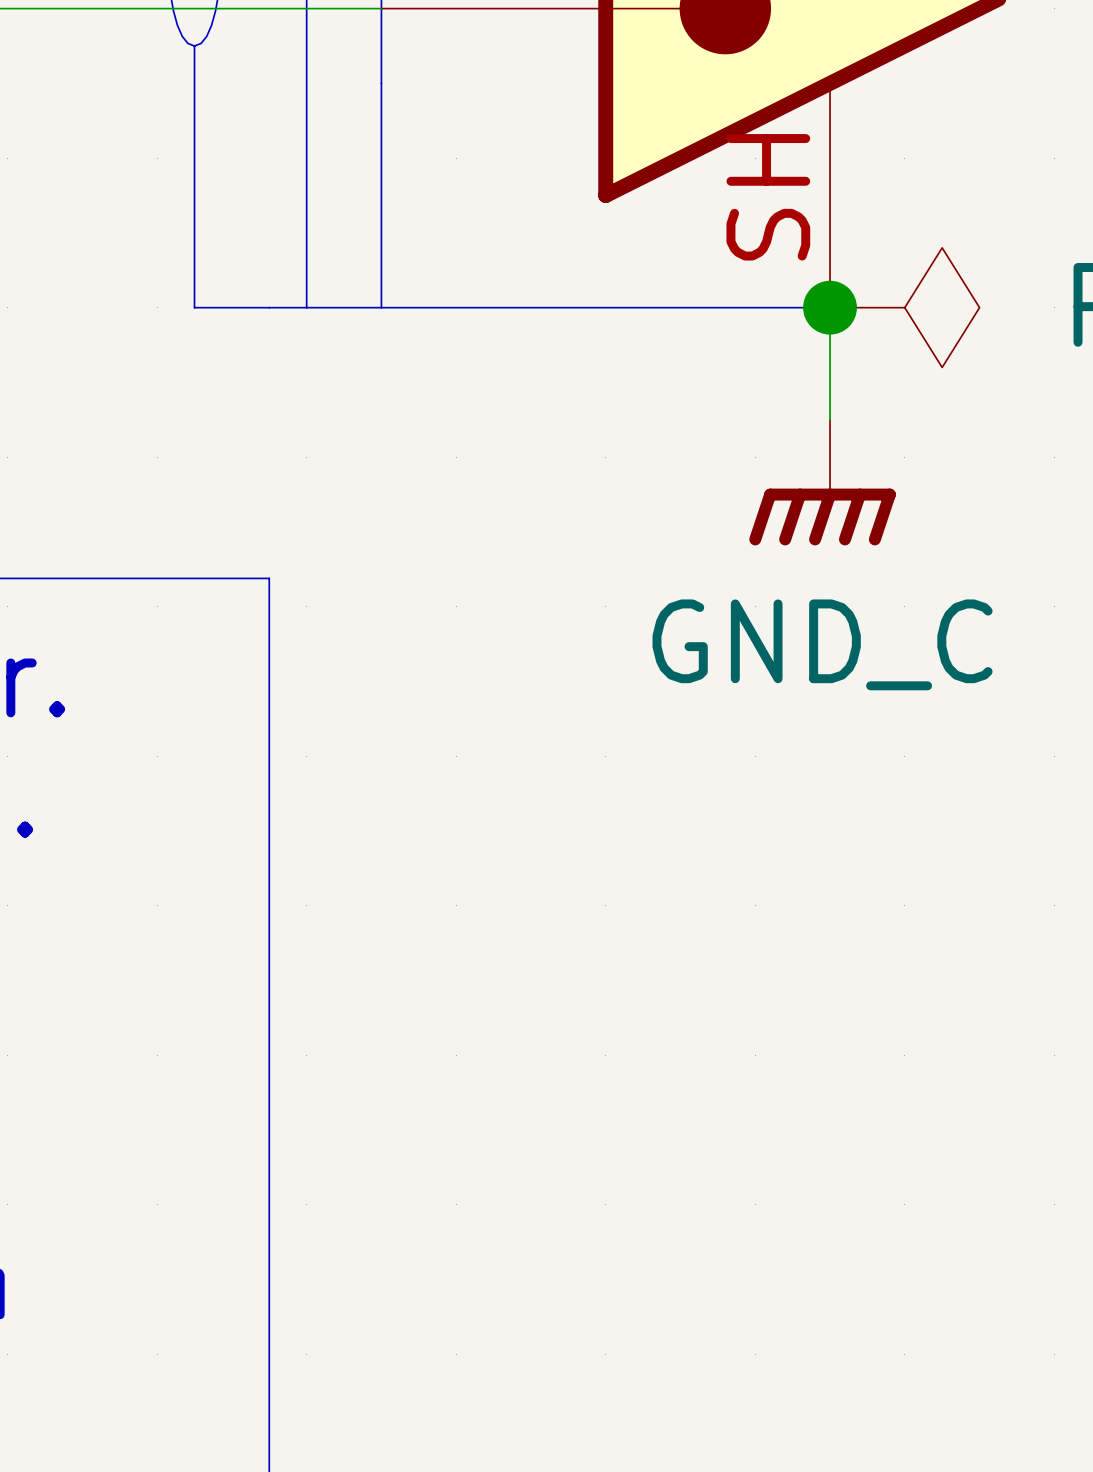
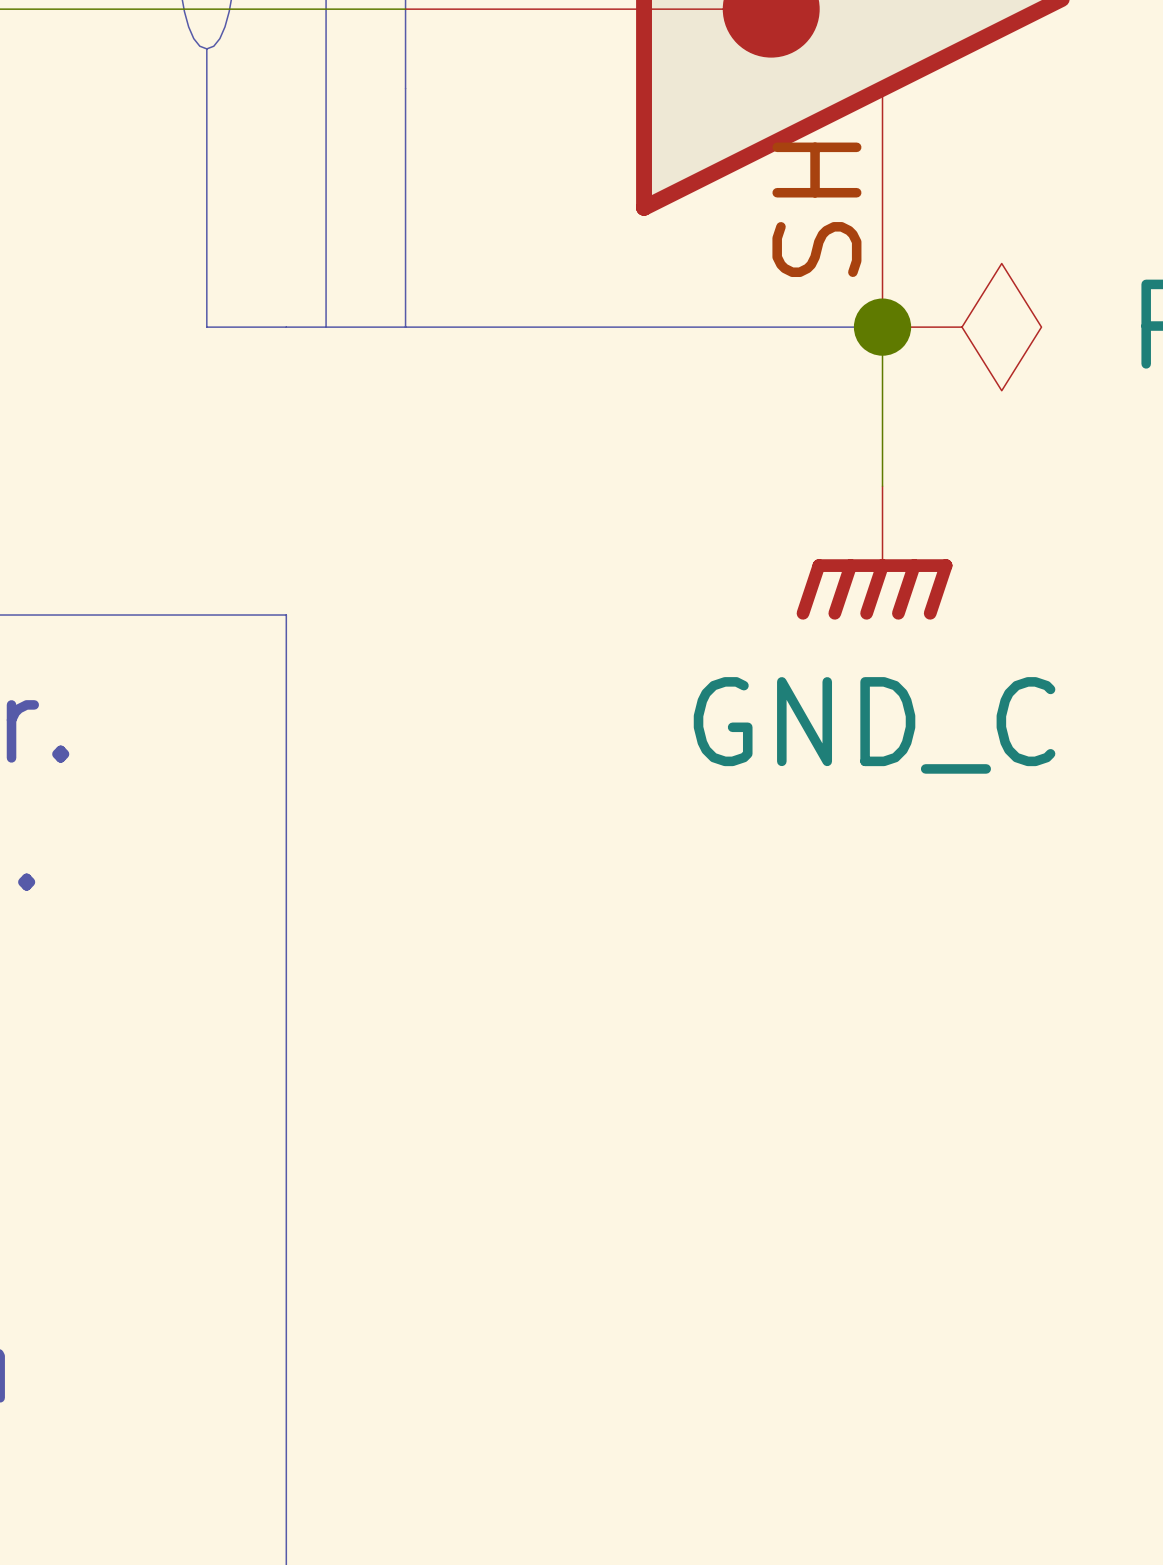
power symbol position: GND_C (822, 482) -> GND_C (874, 552)

